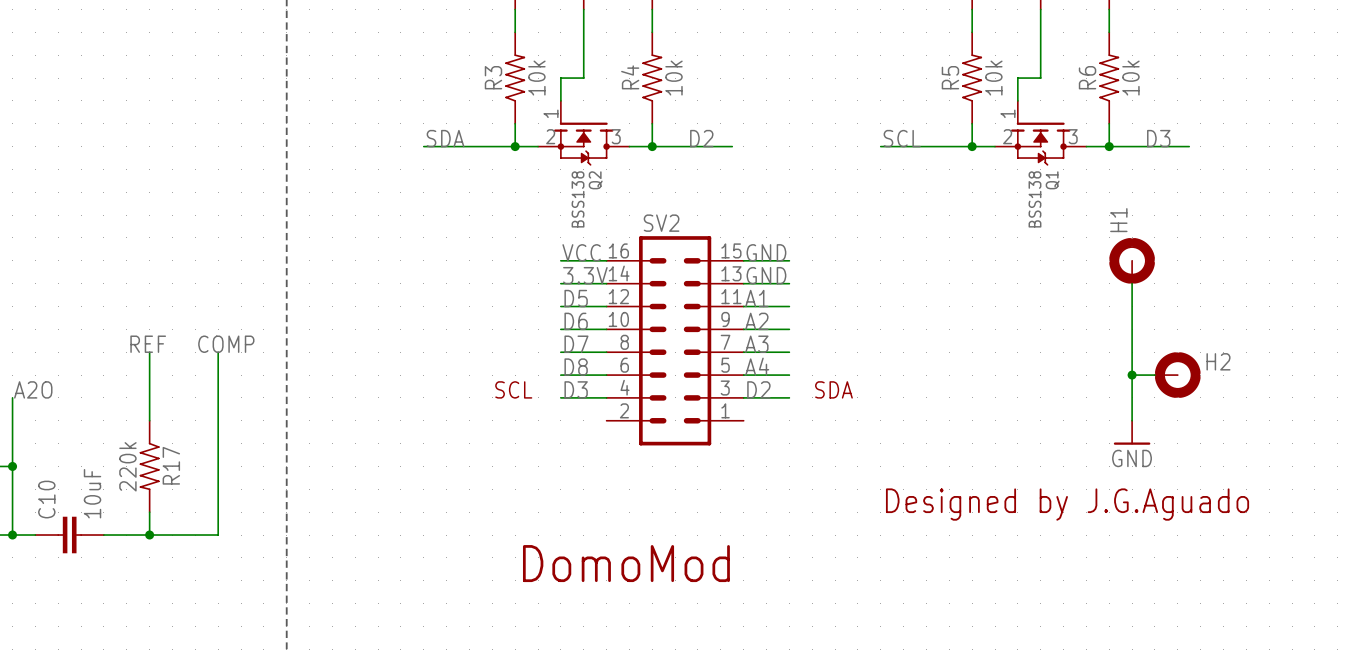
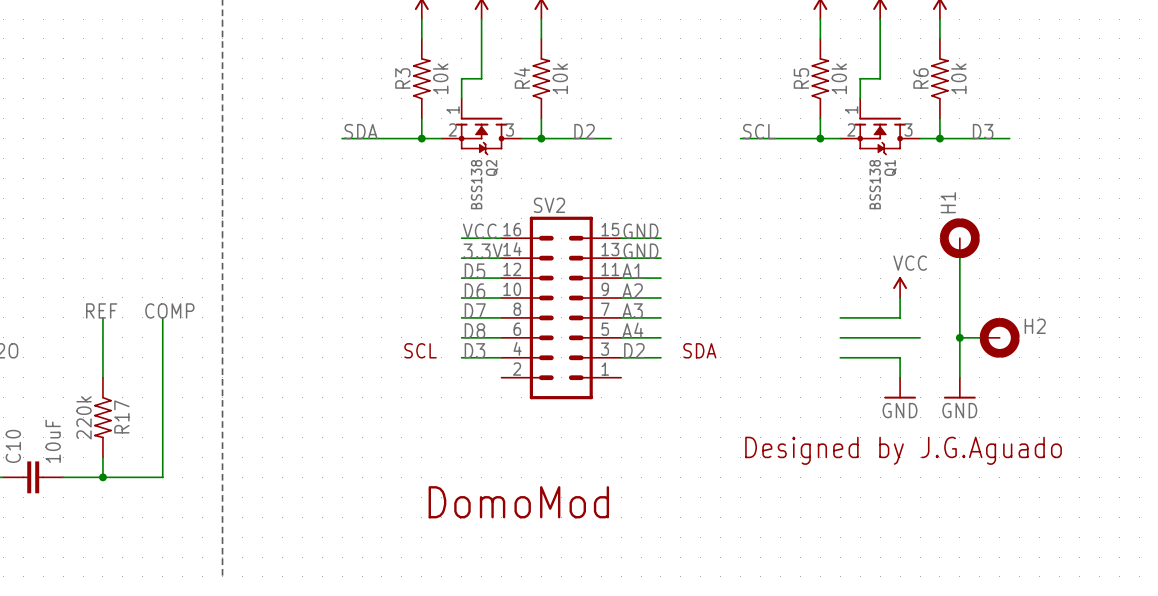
power symbol: none -> VCC (900, 287)
wire: none -> (900, 297) (900, 317) (840, 317)
wire: none -> (840, 337) (920, 337)
wire: none -> (840, 357) (900, 357) (900, 377)
power symbol: none -> GND (900, 388)

